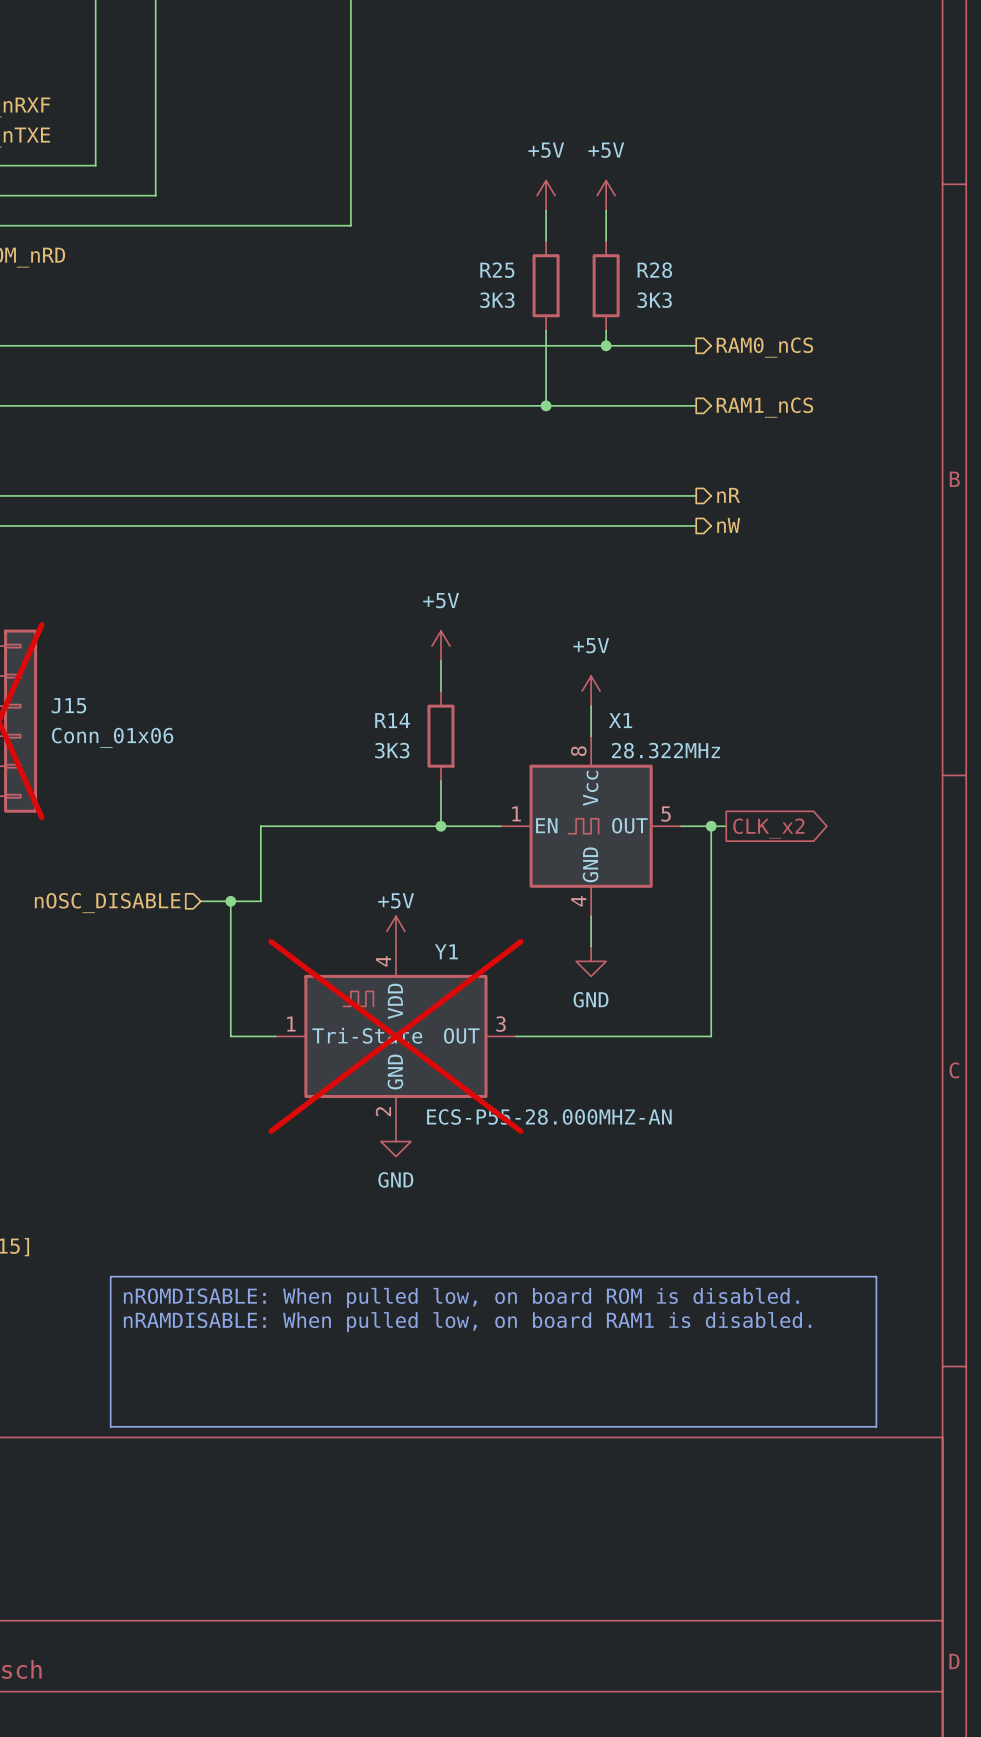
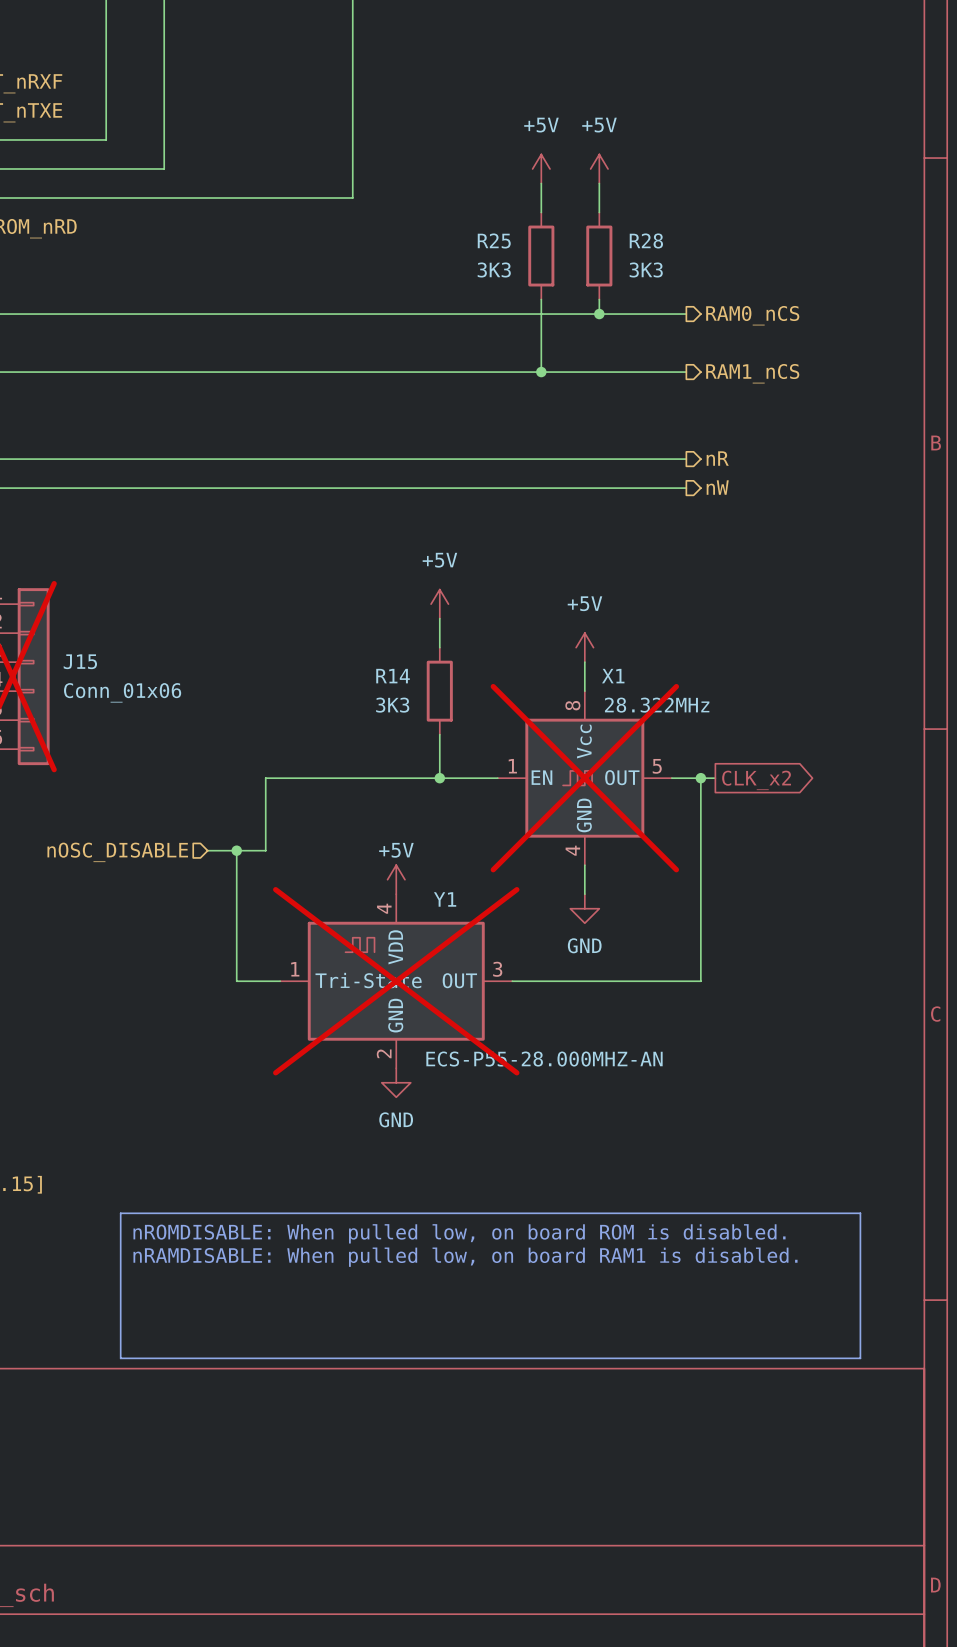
X1 do-not-place cross: none -> (584, 778)

